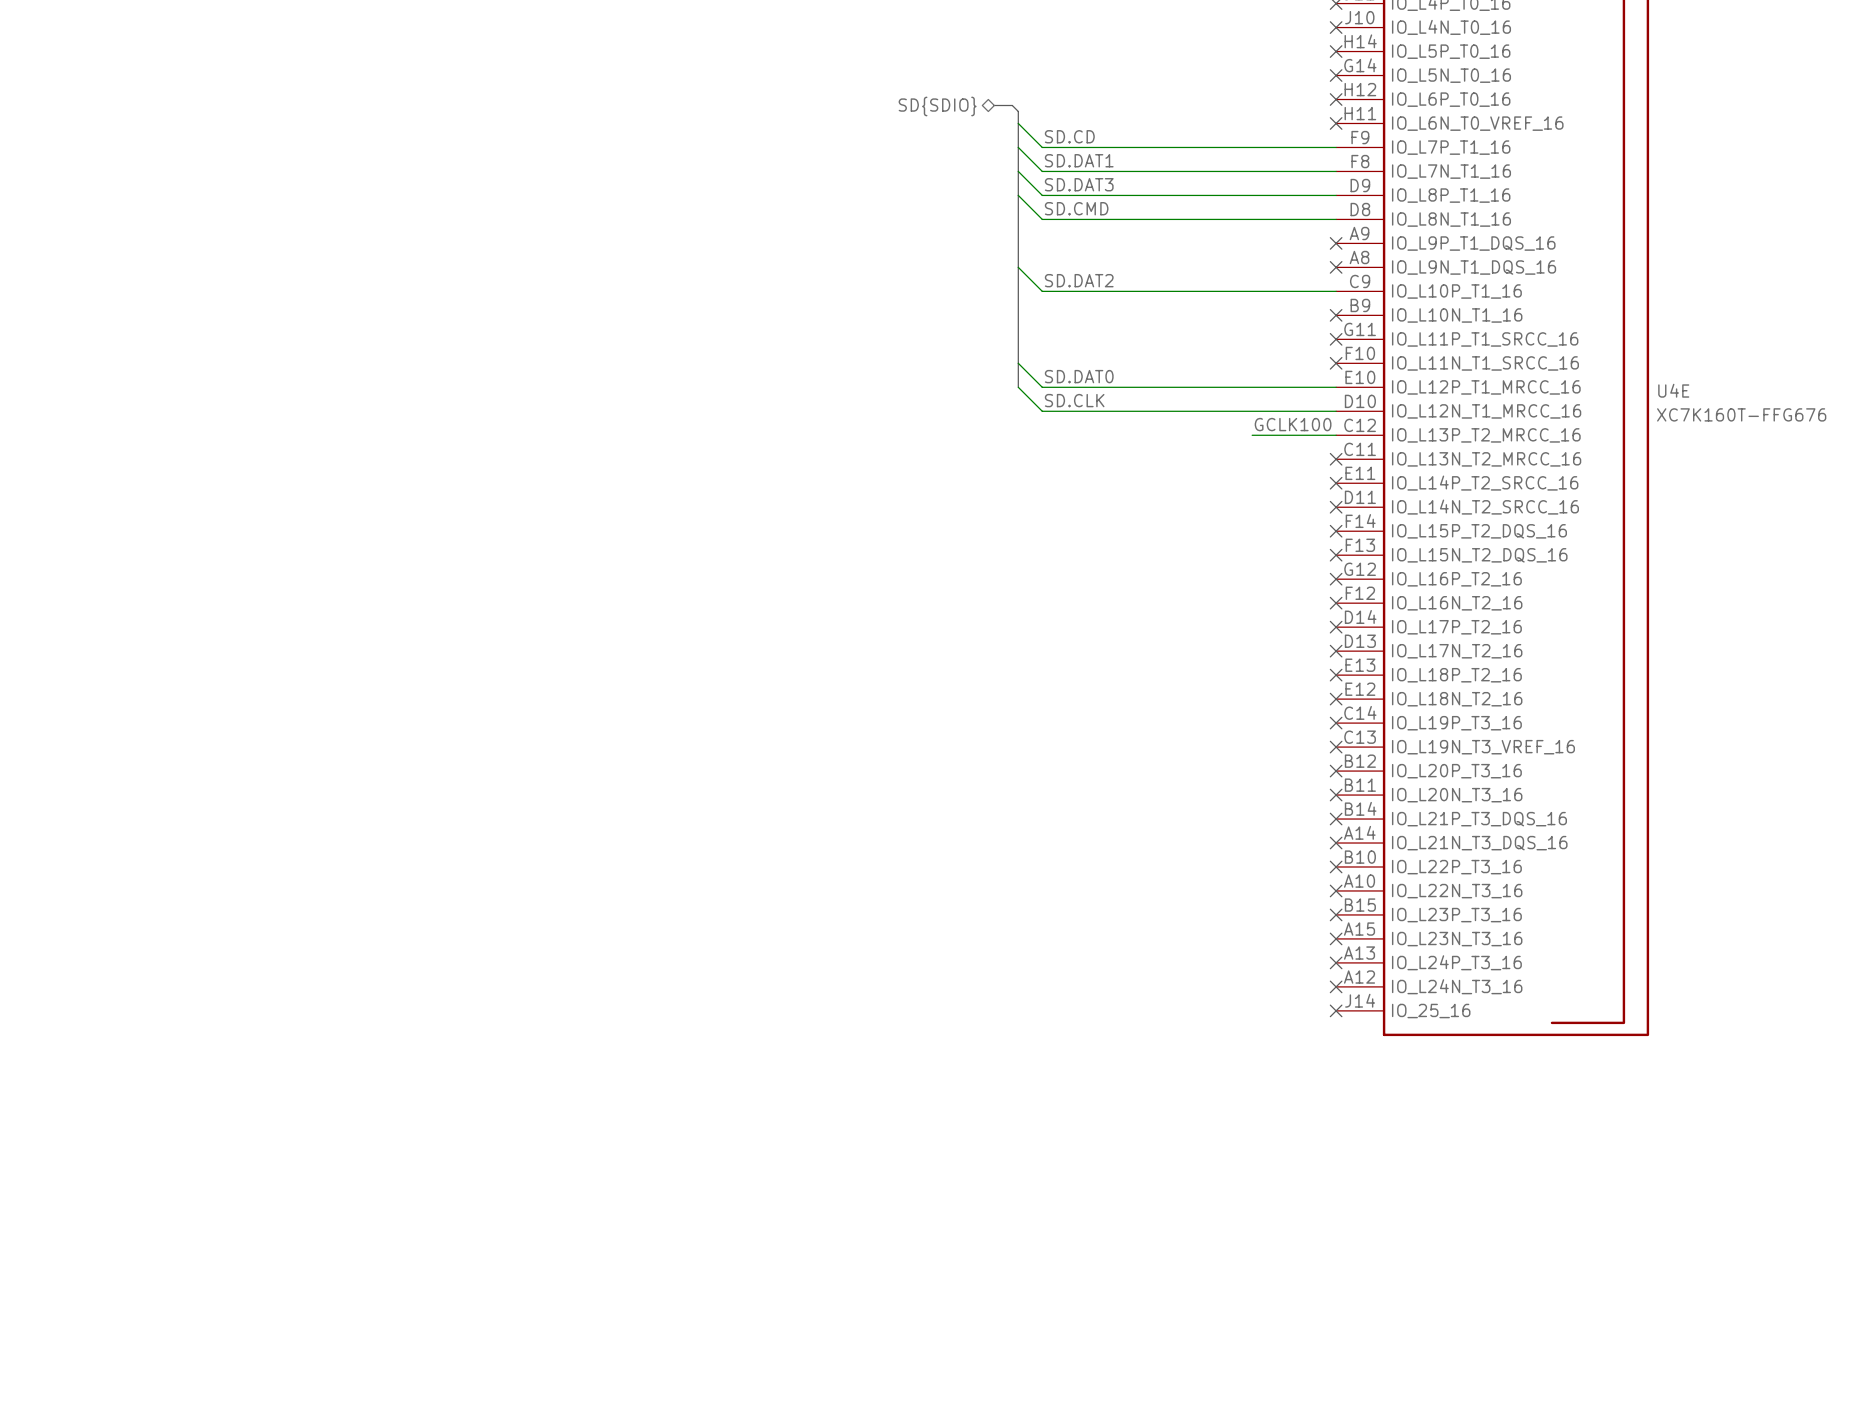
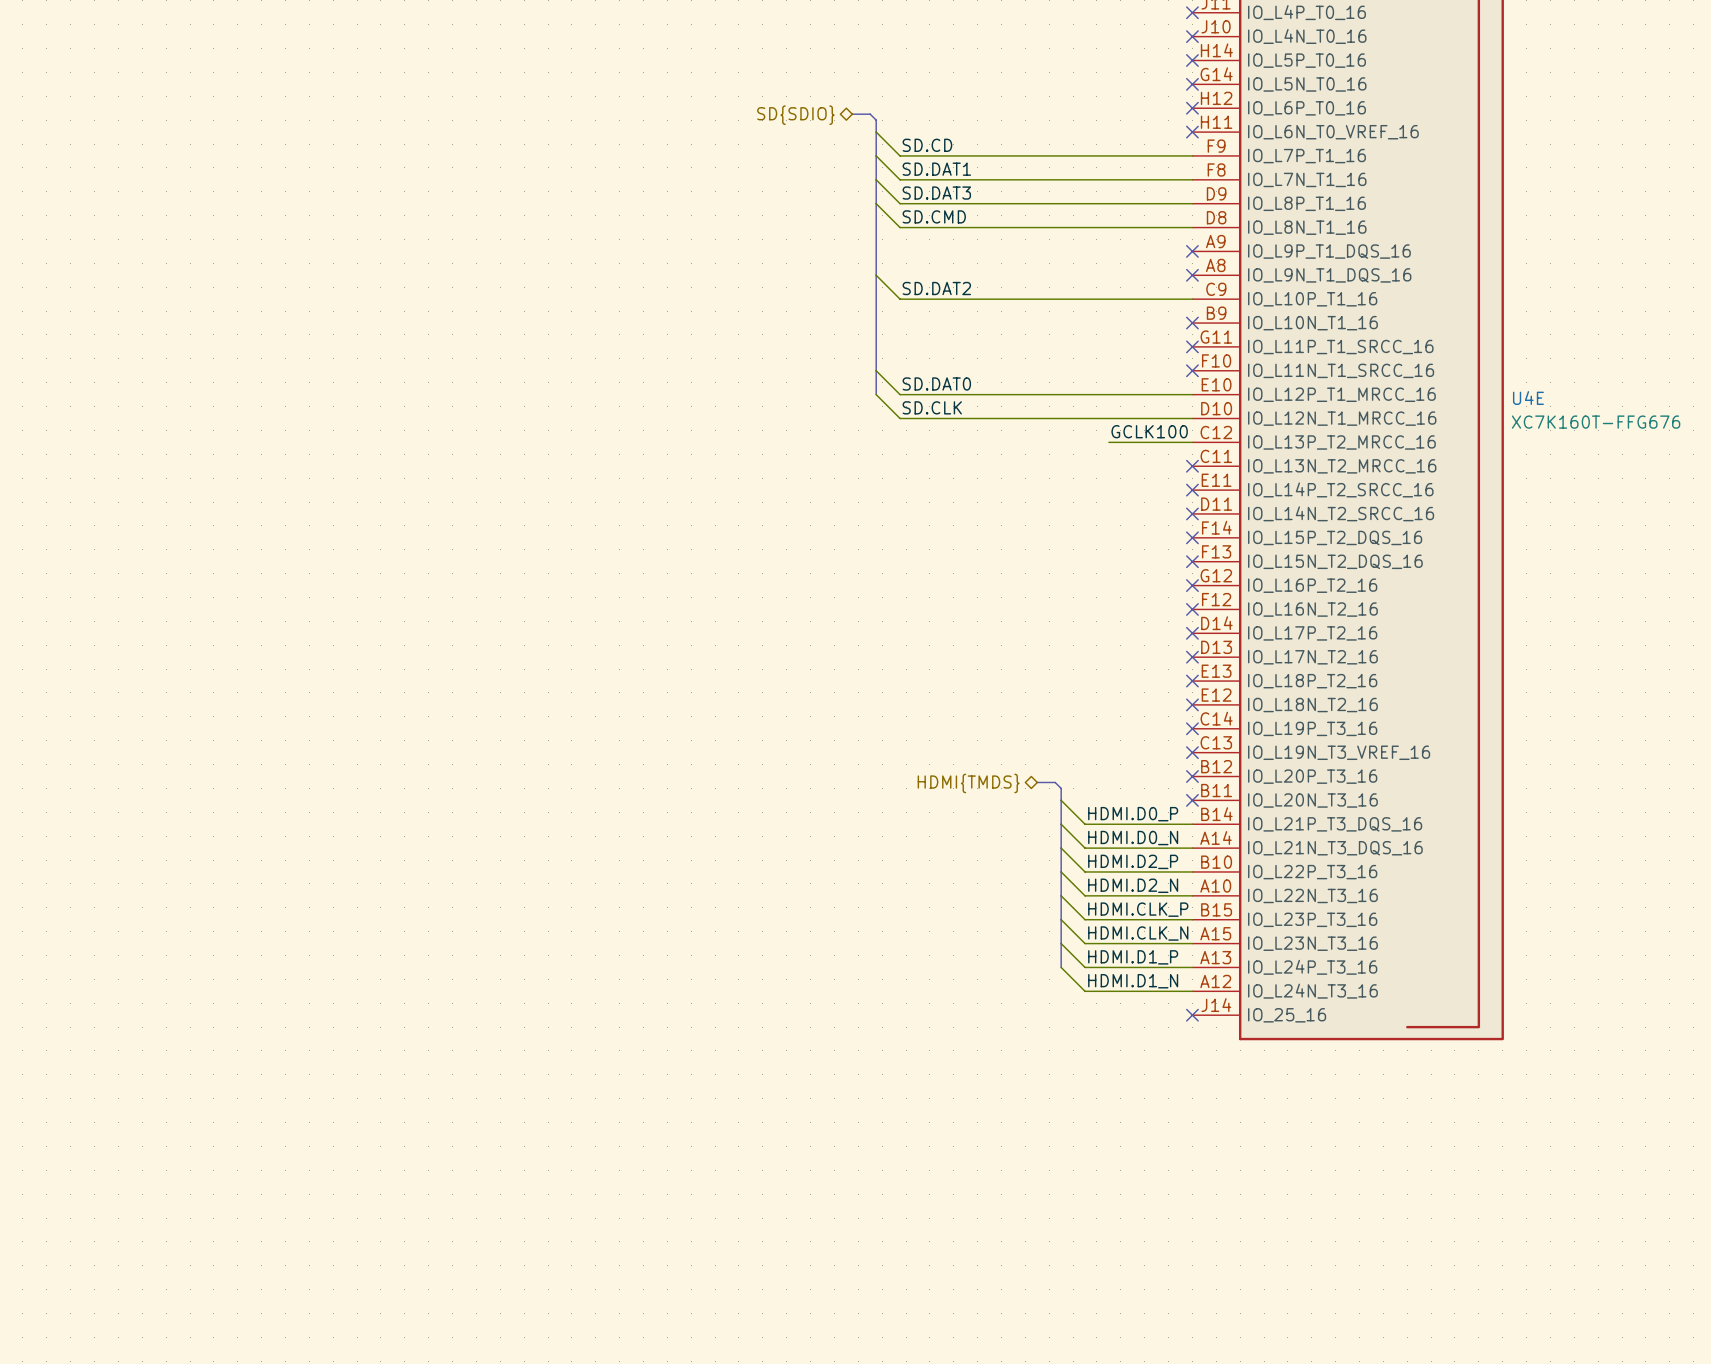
bus: none -> (1037, 782) (1055, 782) (1061, 788) (1061, 967)
hierarchical label: none -> HDMI{TMDS} (968, 783)
wire: none -> (1061, 800) (1085, 824) (1192, 824)
label: none -> HDMI.D0_P (1133, 814)
wire: none -> (1061, 824) (1085, 848) (1192, 848)
no-connect mark: (1336, 819) -> none
label: none -> HDMI.D0_N (1133, 838)
wire: none -> (1061, 848) (1085, 871) (1192, 871)
no-connect mark: (1336, 843) -> none
label: none -> HDMI.D2_P (1133, 861)
wire: none -> (1061, 871) (1085, 895) (1192, 895)
no-connect mark: (1336, 866) -> none
label: none -> HDMI.D2_N (1133, 885)
wire: none -> (1061, 895) (1085, 919) (1192, 919)
no-connect mark: (1336, 890) -> none
label: none -> HDMI.CLK_P (1138, 909)
wire: none -> (1061, 919) (1085, 943) (1192, 943)
no-connect mark: (1336, 914) -> none
label: none -> HDMI.CLK_N (1138, 933)
wire: none -> (1061, 943) (1085, 967) (1192, 967)
no-connect mark: (1336, 938) -> none
label: none -> HDMI.D1_P (1133, 957)
wire: none -> (1061, 967) (1085, 991) (1192, 991)
no-connect mark: (1336, 962) -> none
label: none -> HDMI.D1_N (1133, 981)
no-connect mark: (1336, 986) -> none

